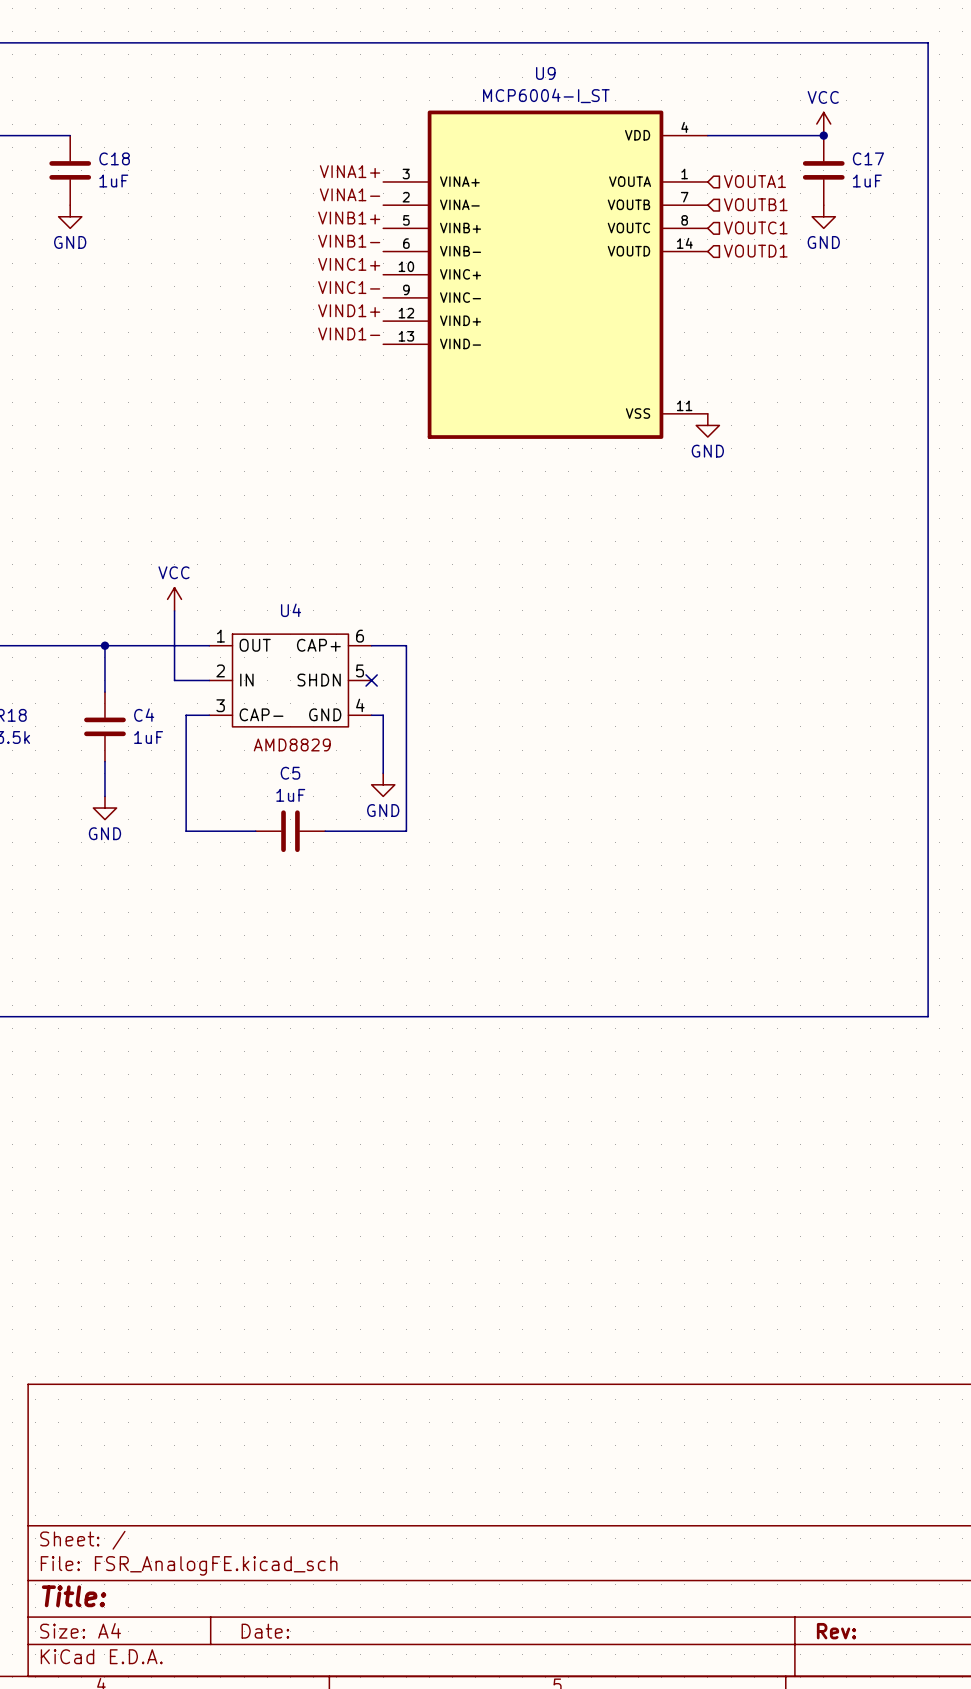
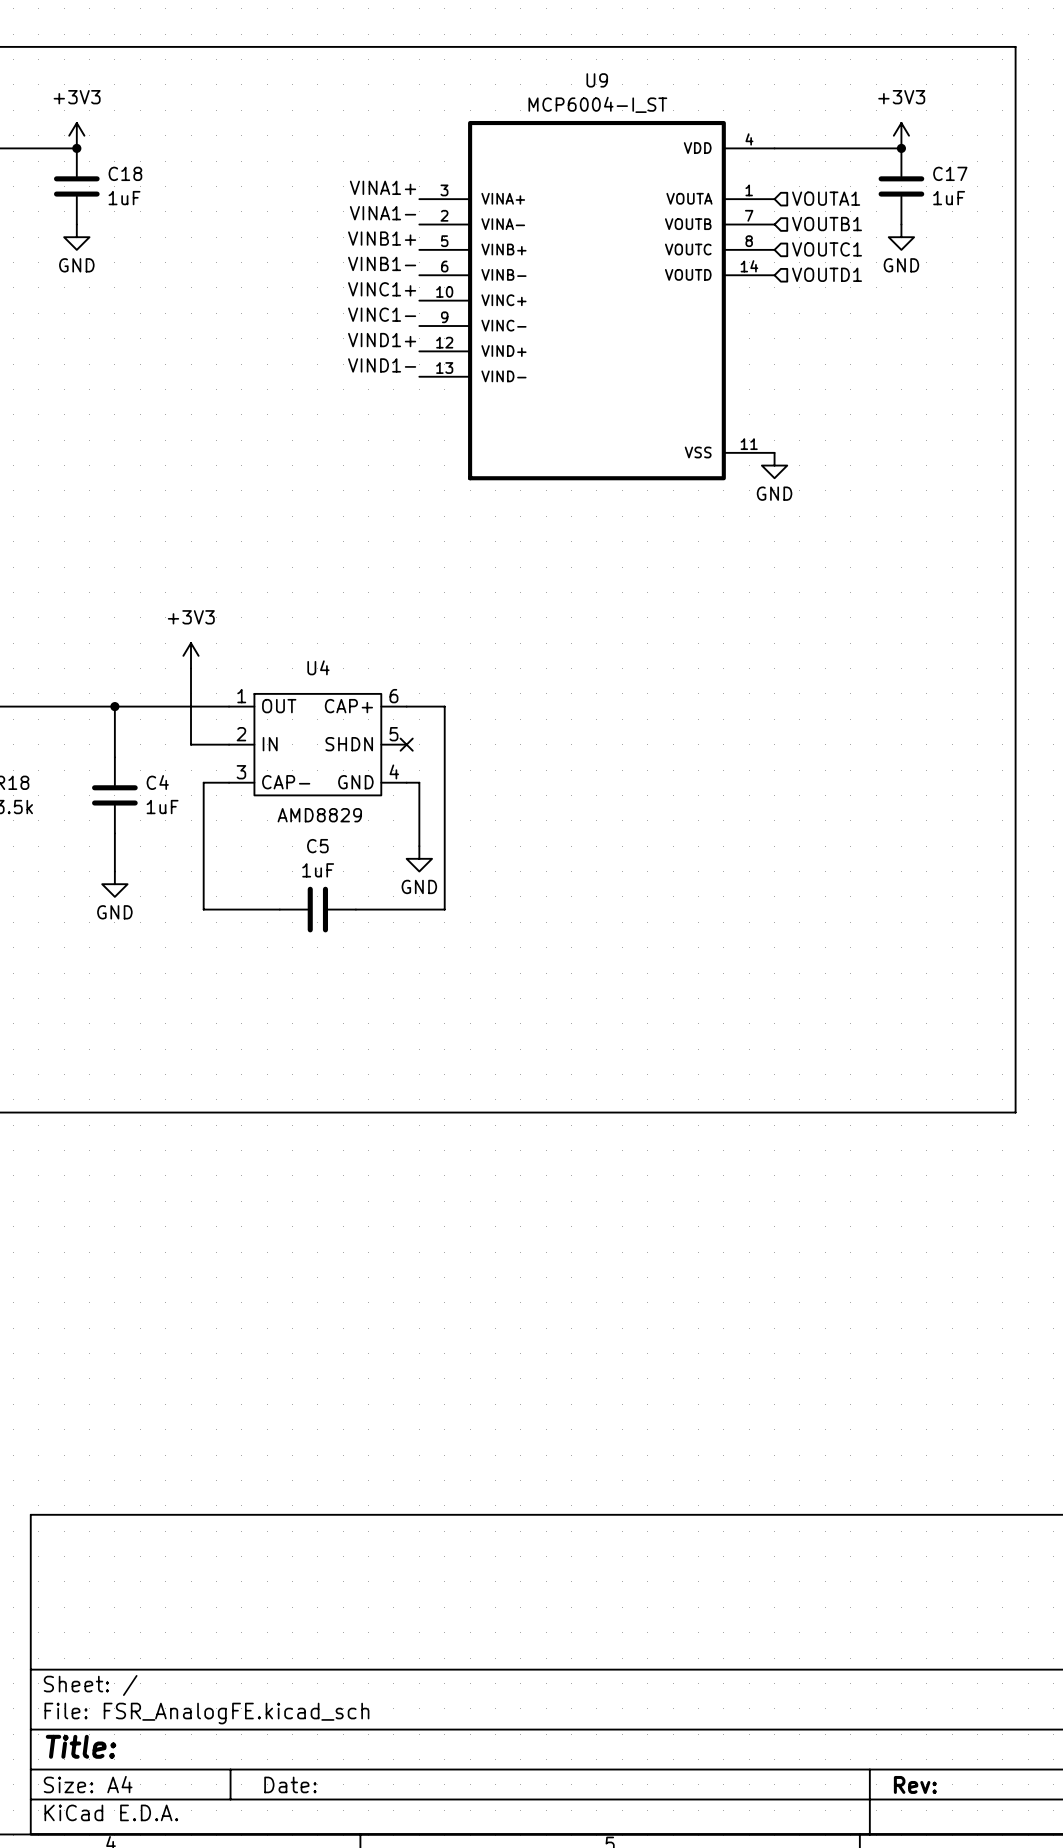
power symbol: none -> +3V3 (76, 135)
power symbol: VCC (823, 124) -> +3V3 (901, 135)
junction: none -> (76, 148)
power symbol: VCC (174, 599) -> +3V3 (191, 655)

